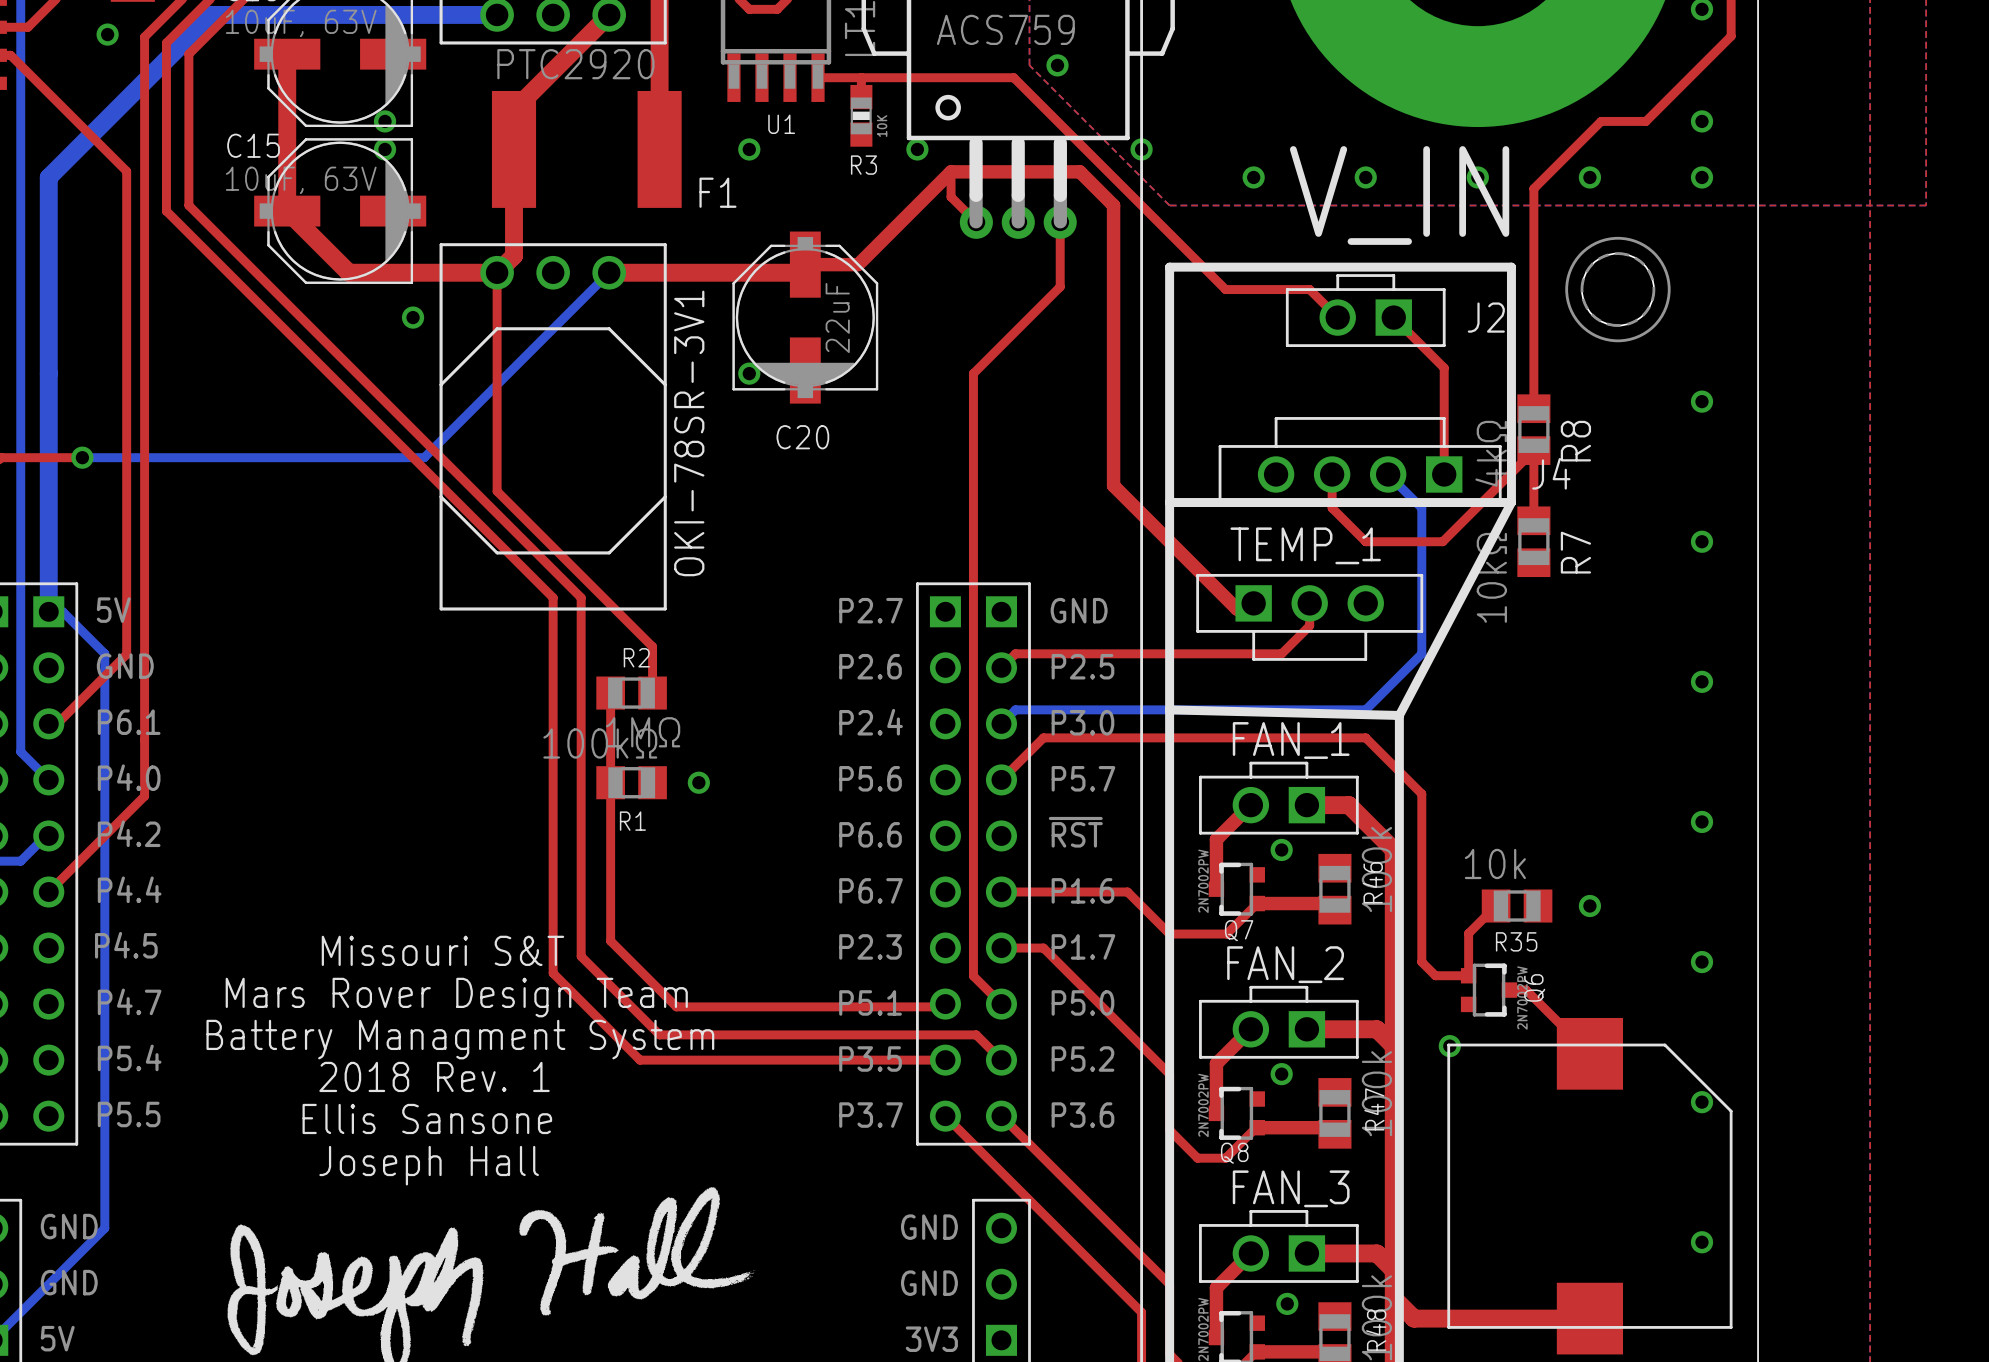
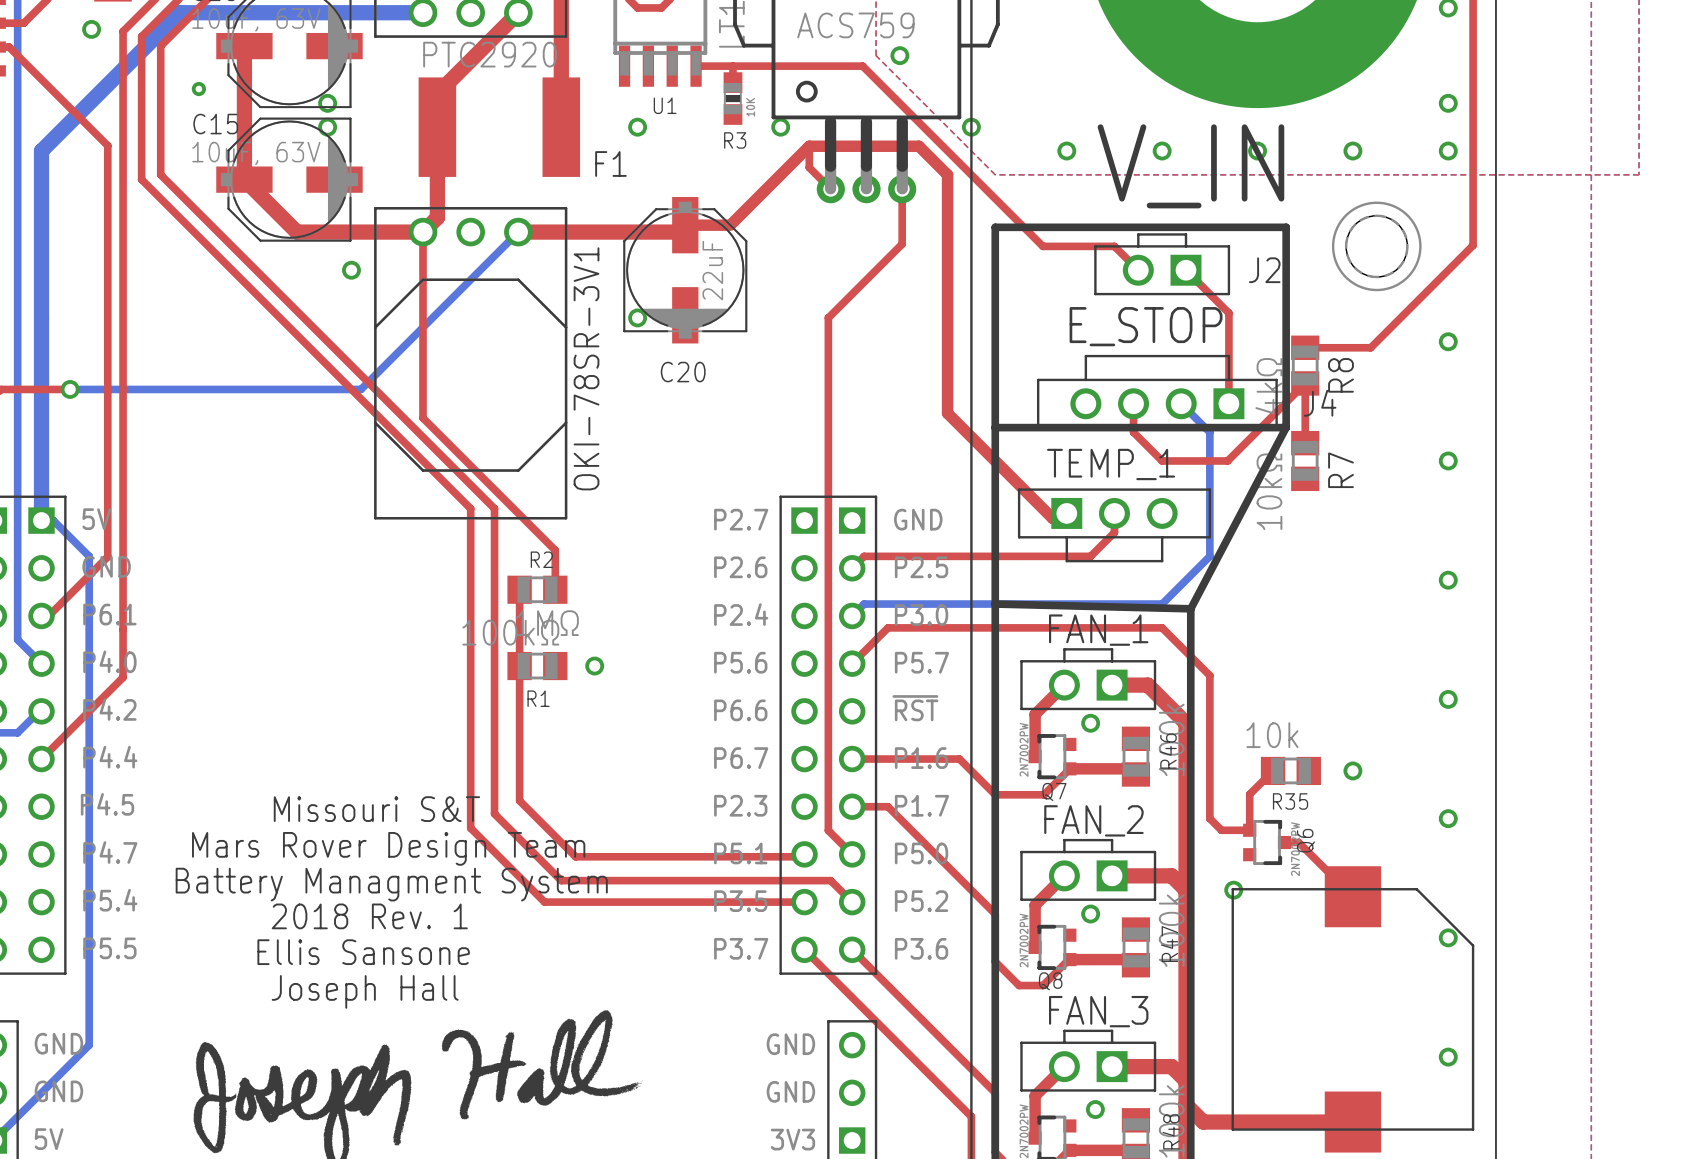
top track: (1731, 36) (1645, 121) (1601, 121) (1533, 188) (1533, 408) -> (1473, 30) (1473, 245) (1370, 347) (1305, 347)
via: none -> (198, 89)
text: none -> E_STOP (1146, 326)

